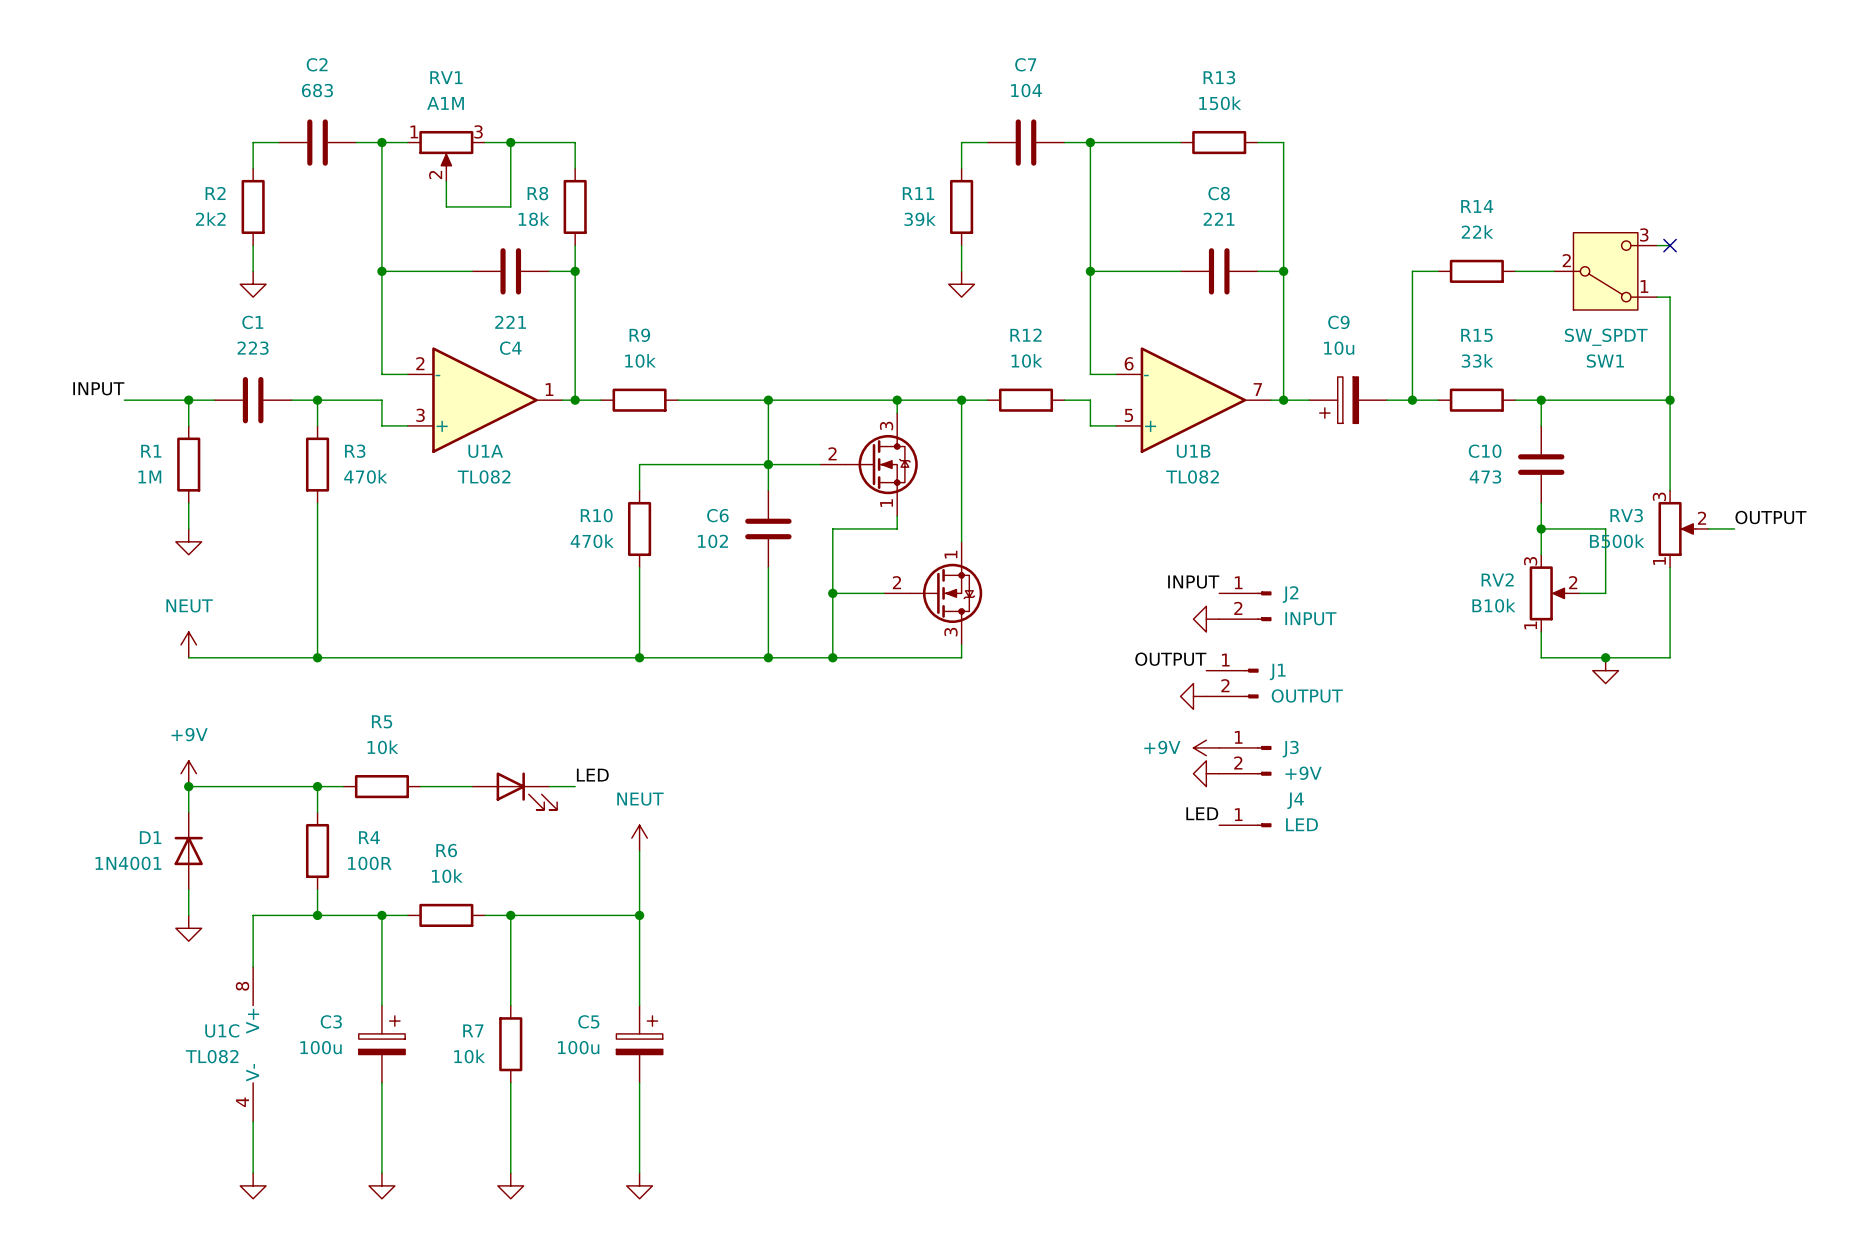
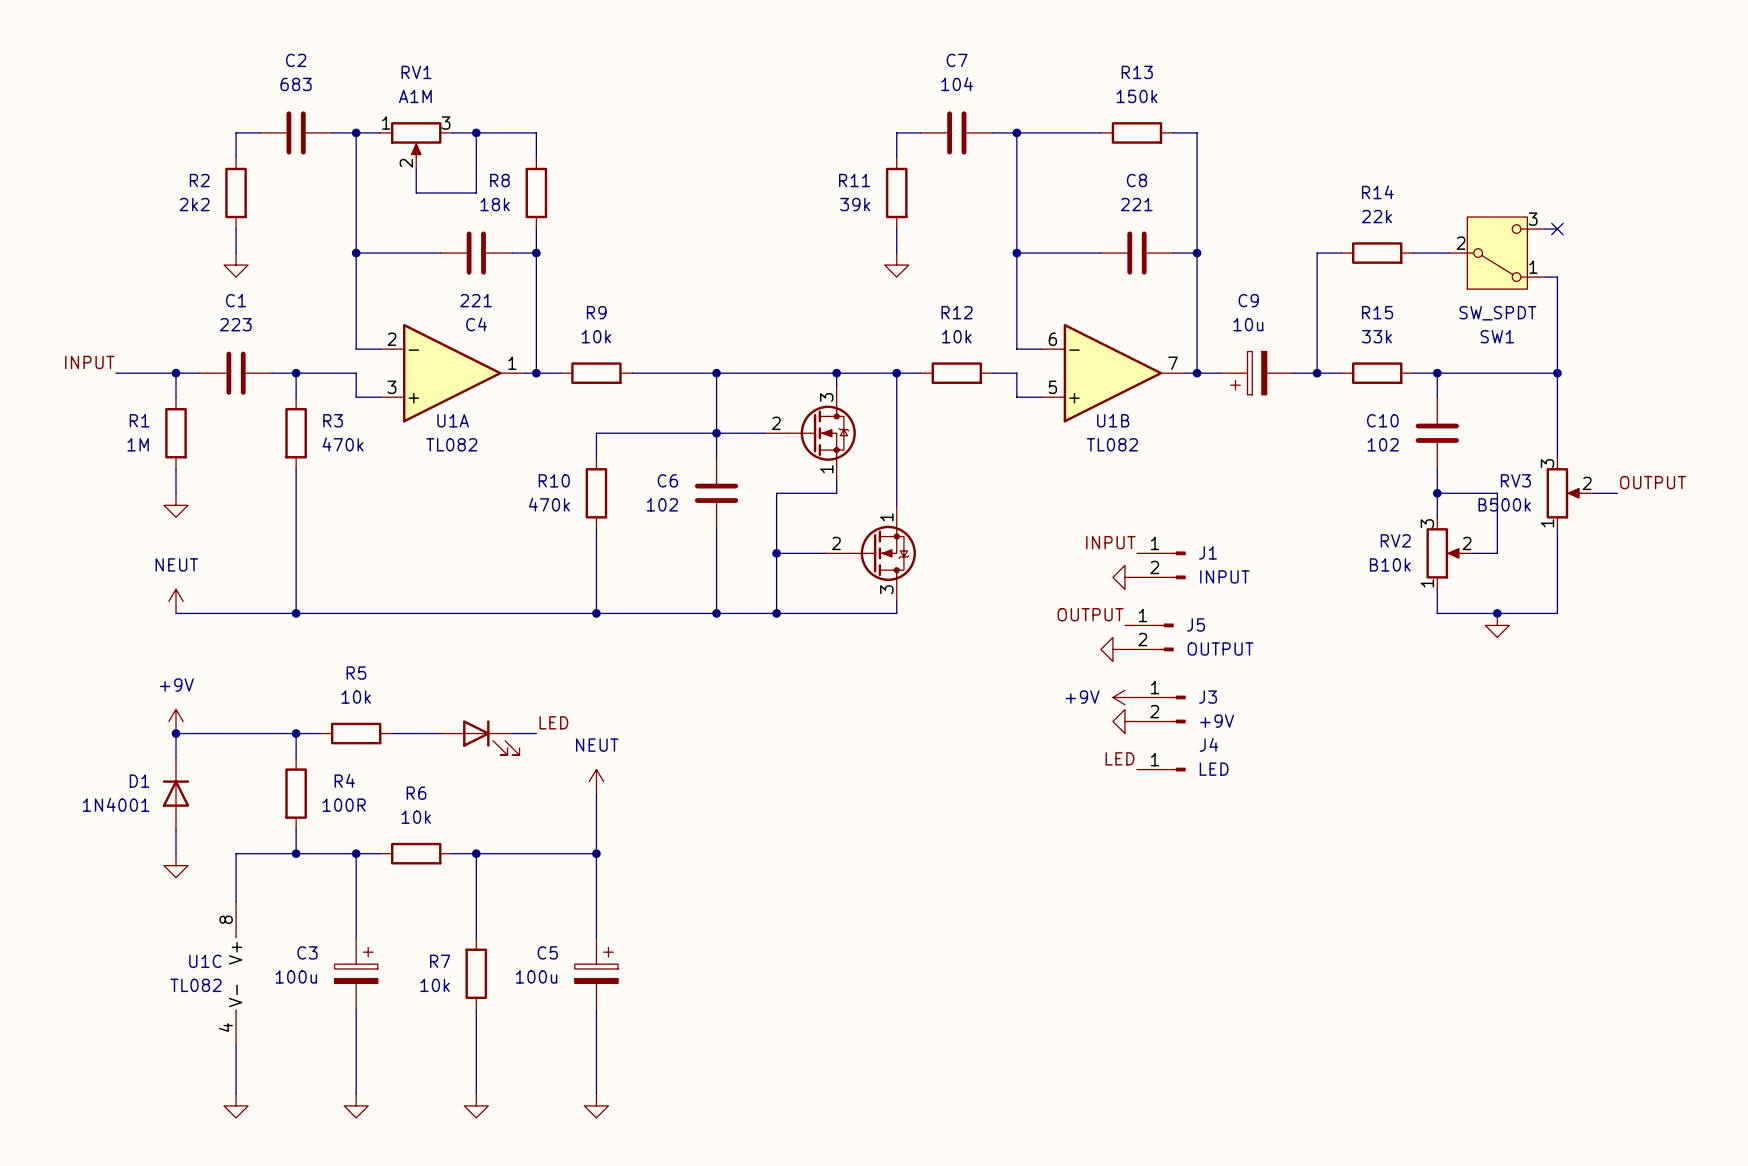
C10 value: 473 (1485, 476) -> 102 (1383, 444)
J2 name: J2 (1290, 594) -> J1 (1207, 552)
J1 name: J1 (1277, 671) -> J5 (1195, 624)

